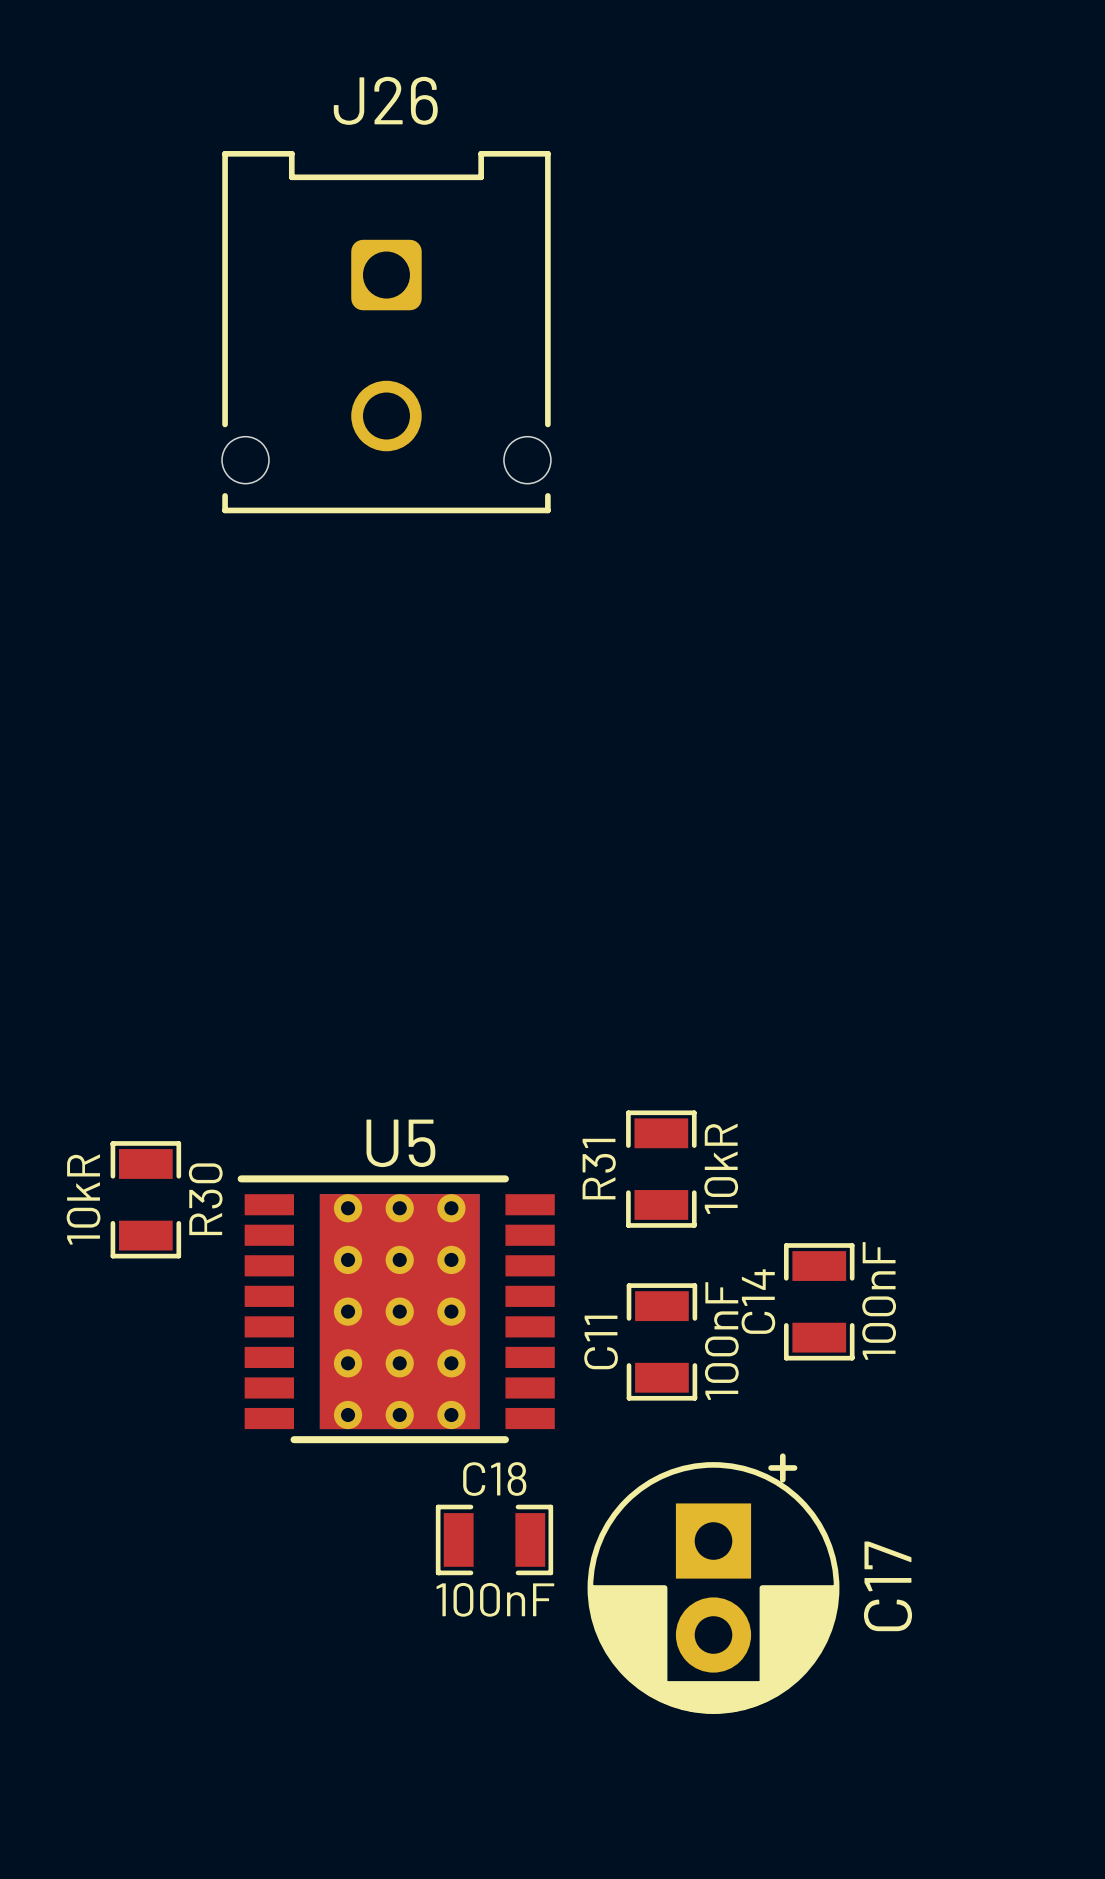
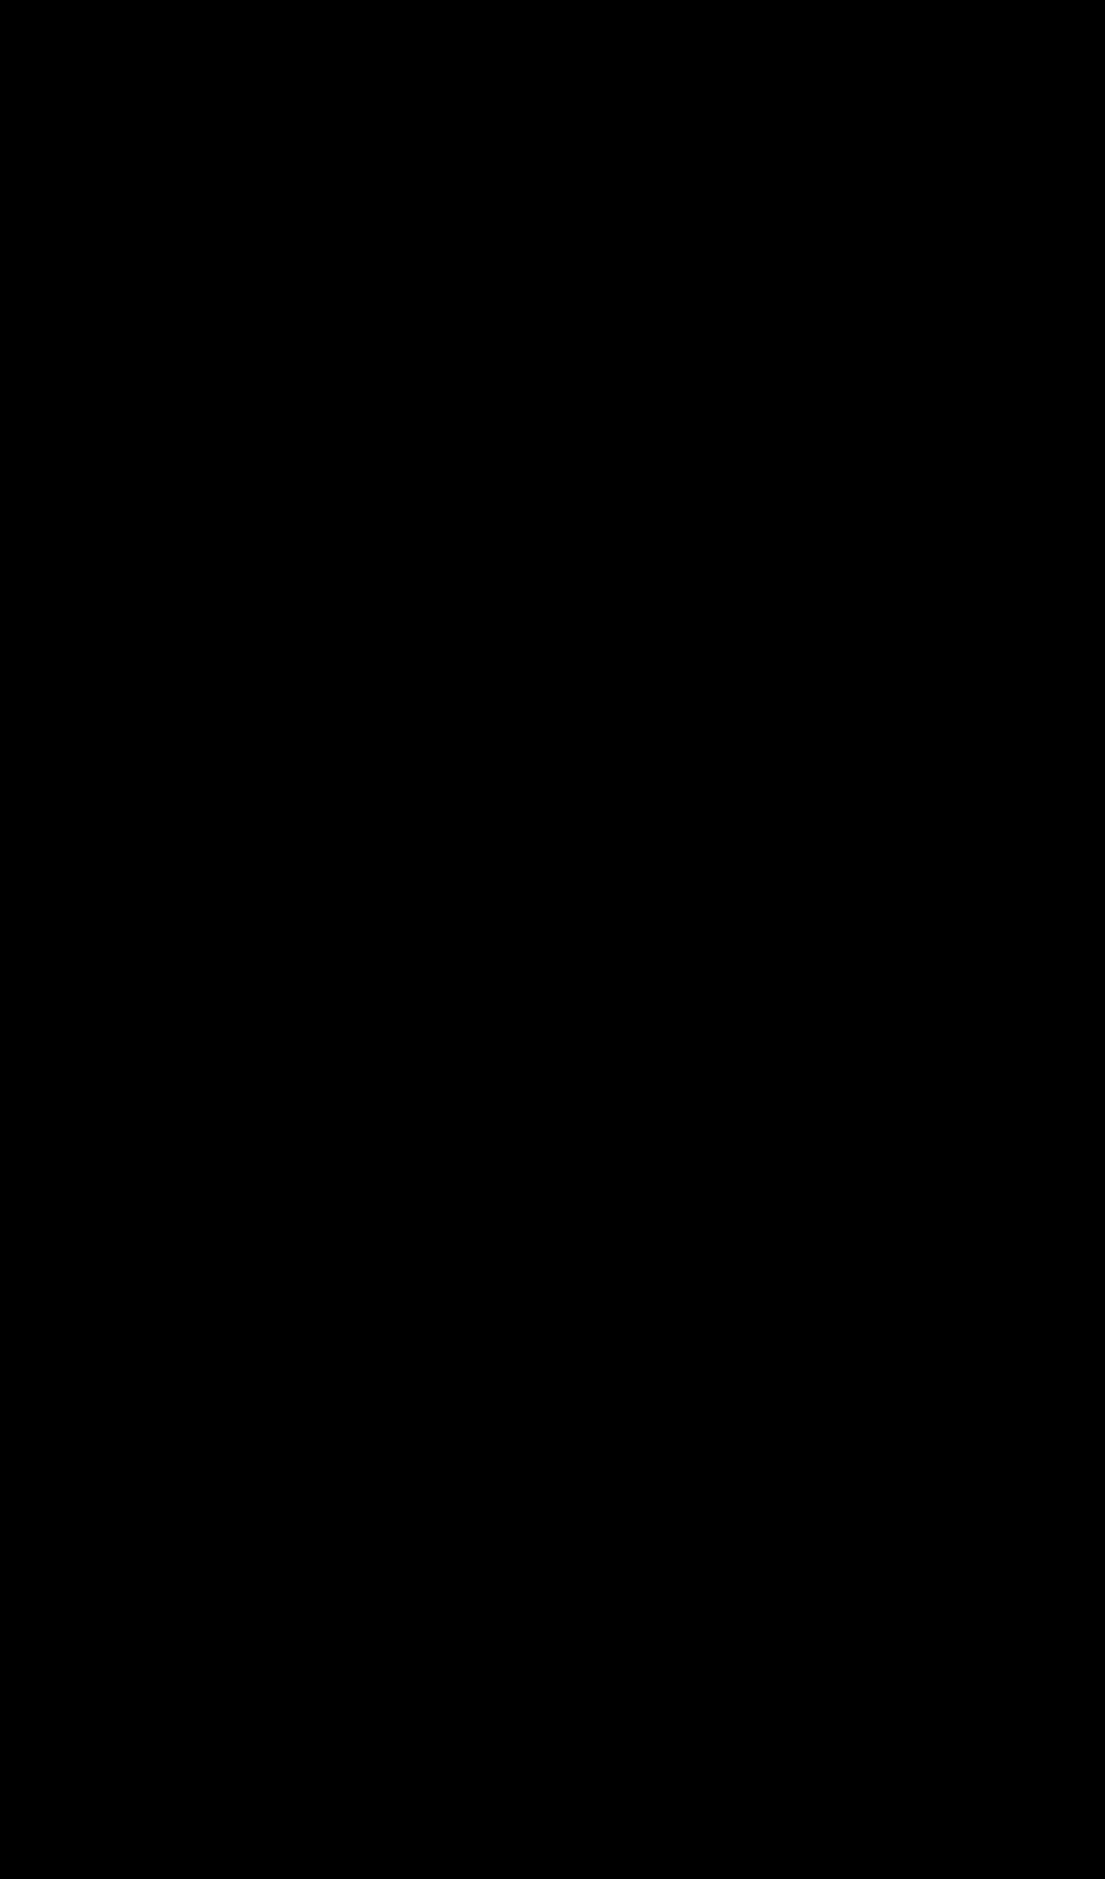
J26: (386, 332) -> none
R31: 10kR (661, 1169) -> none
R30: 10kR (145, 1199) -> none
C14: 100nF (819, 1301) -> none
U5: (396, 1309) -> none
C11: 100nF (661, 1341) -> none
C18: 100nF (494, 1539) -> none
C17: (713, 1583) -> none

